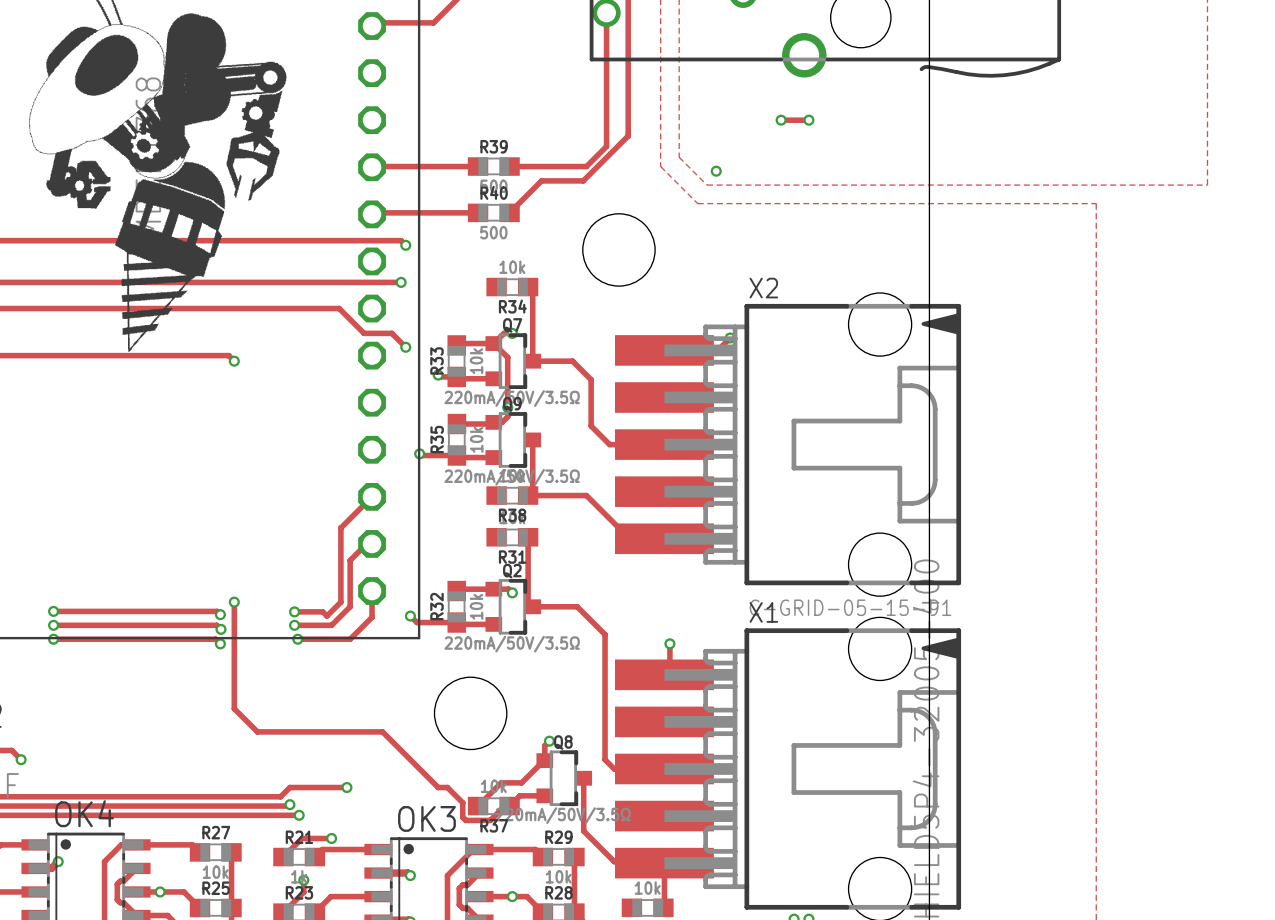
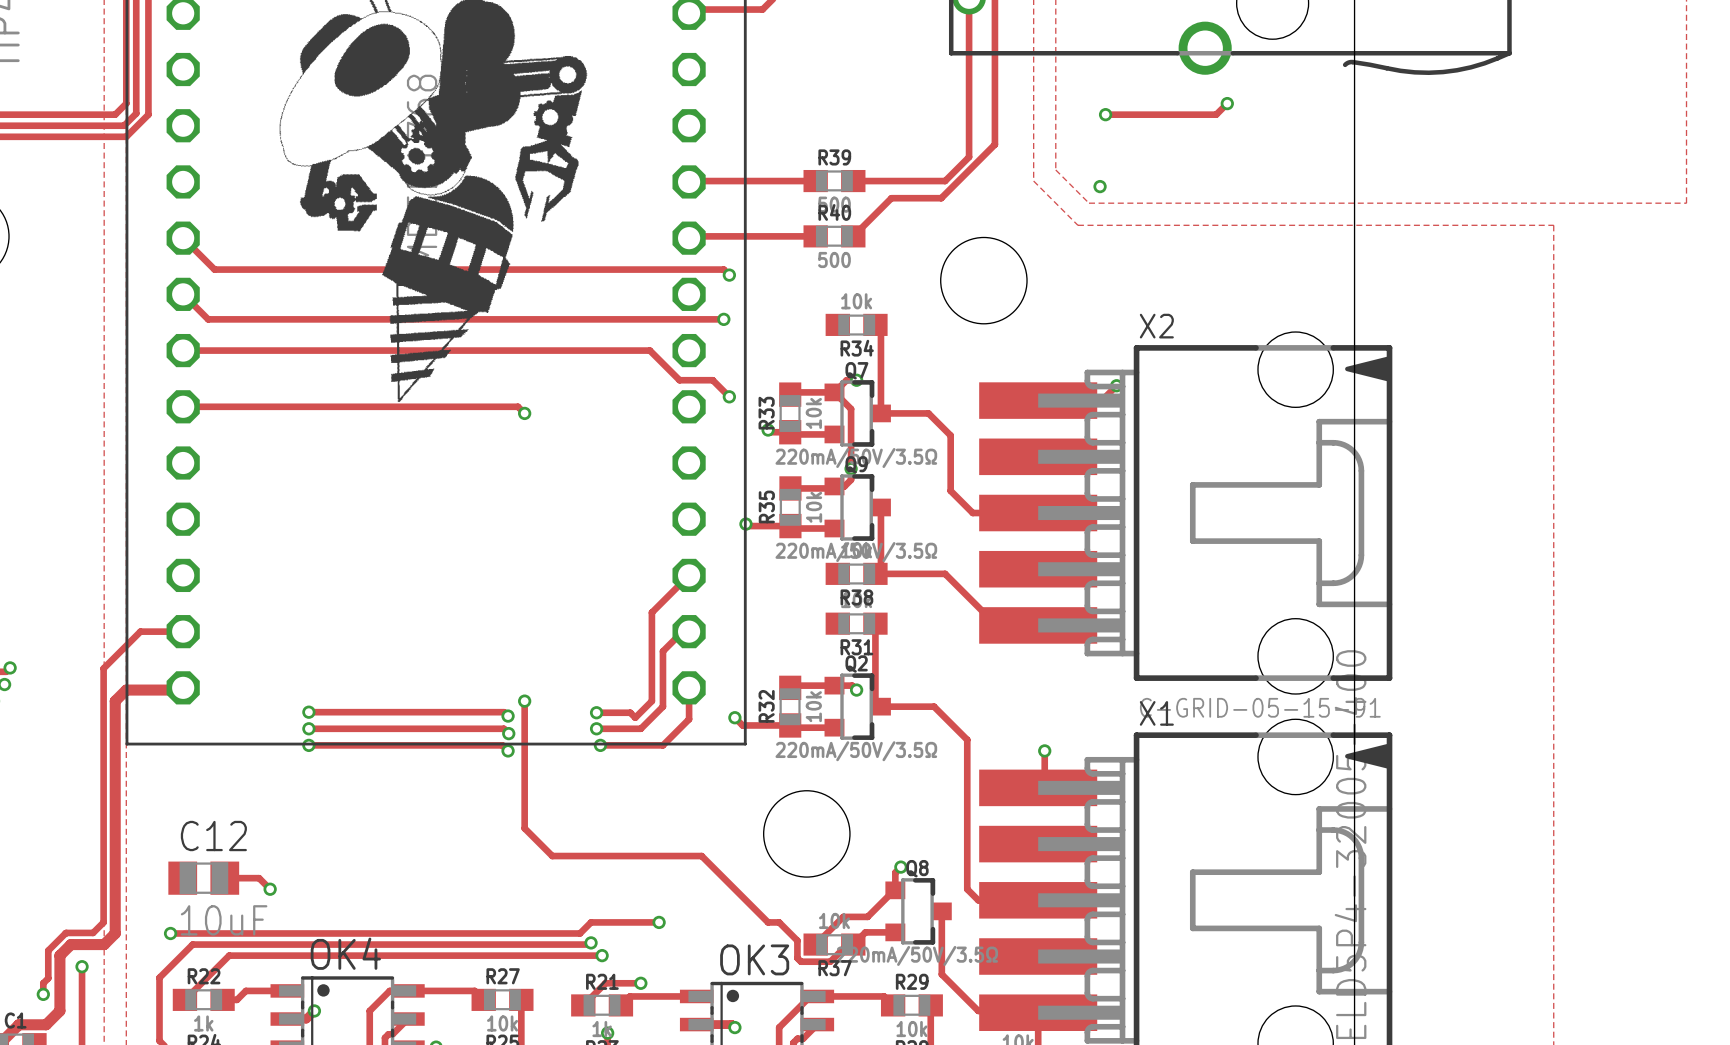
track: none -> (1227, 103) (1216, 114) (1105, 114)
via: none -> (1227, 103)
via: none -> (1105, 114)
track: (781, 120) (808, 120) -> none
via: (781, 120) -> none
via: (808, 120) -> none

